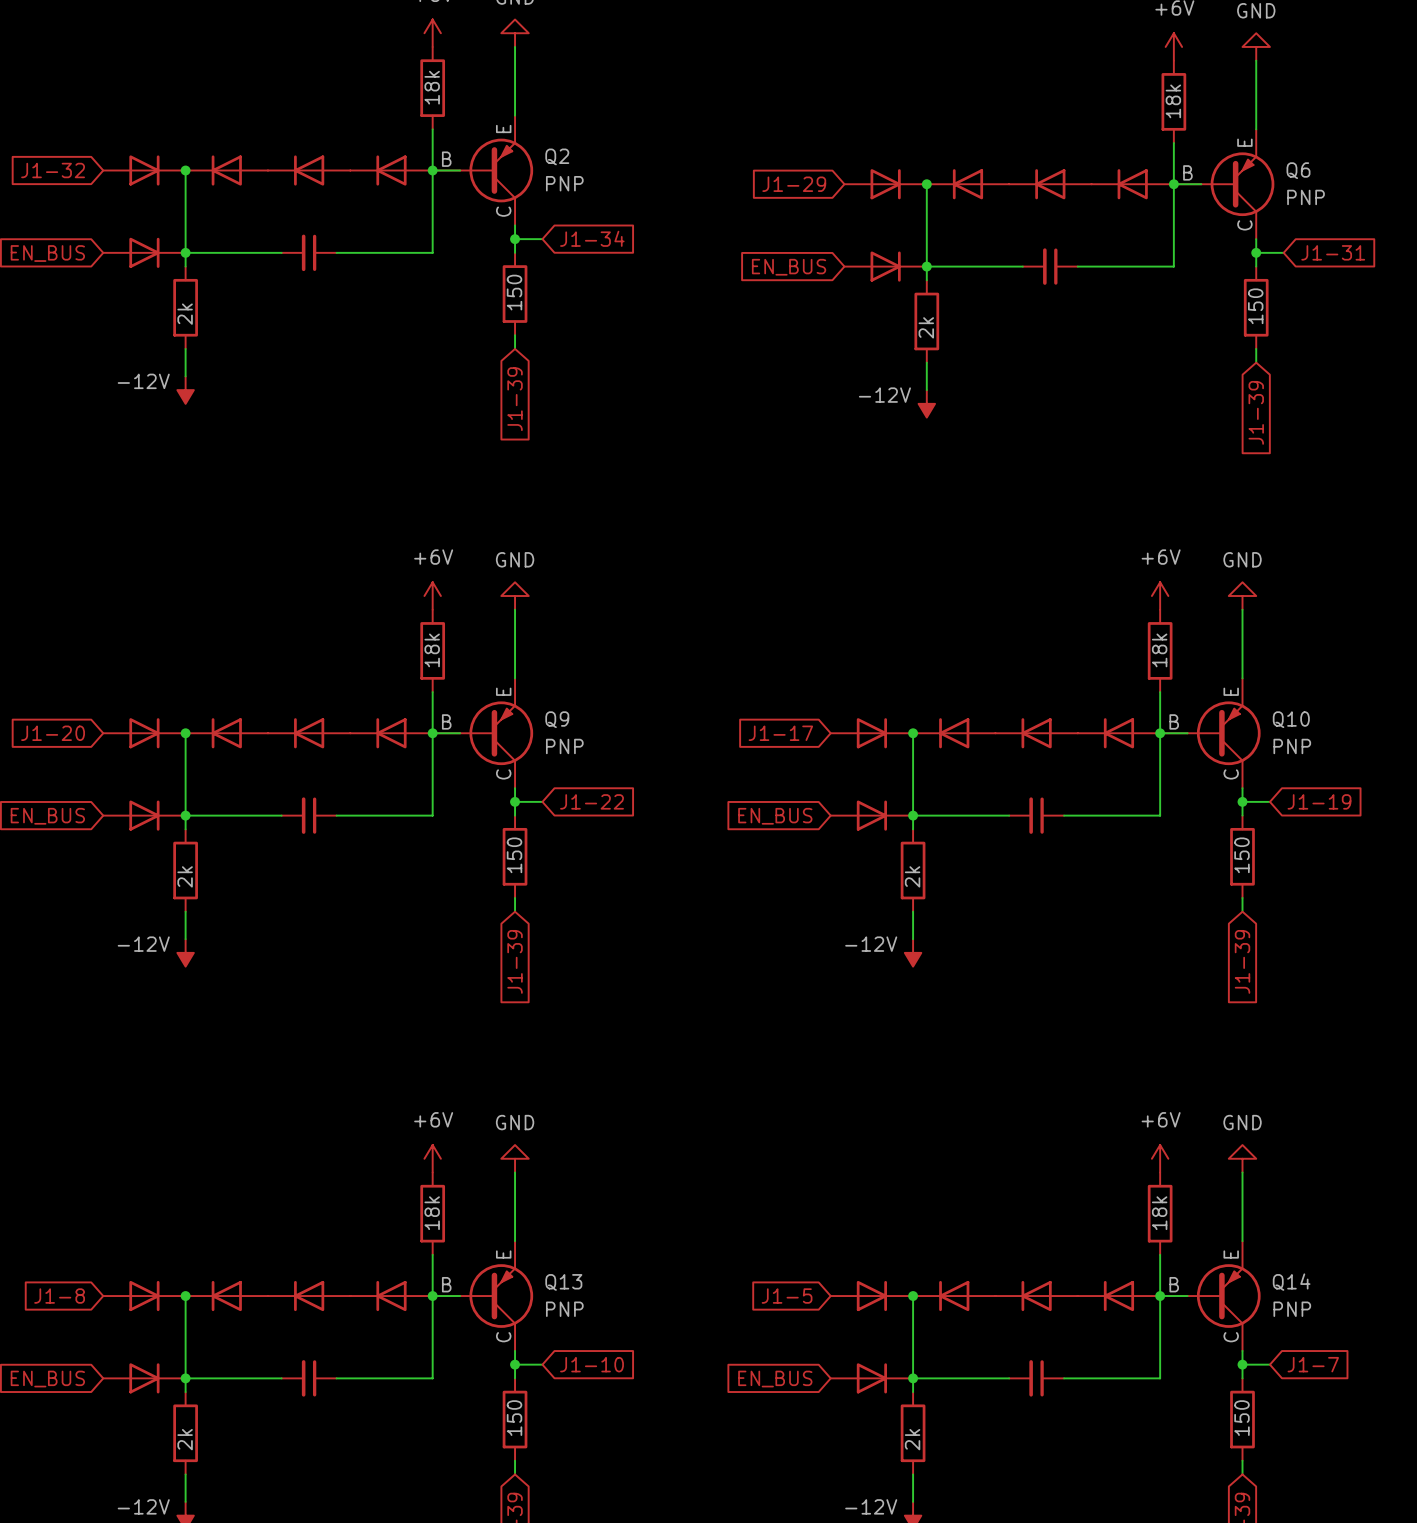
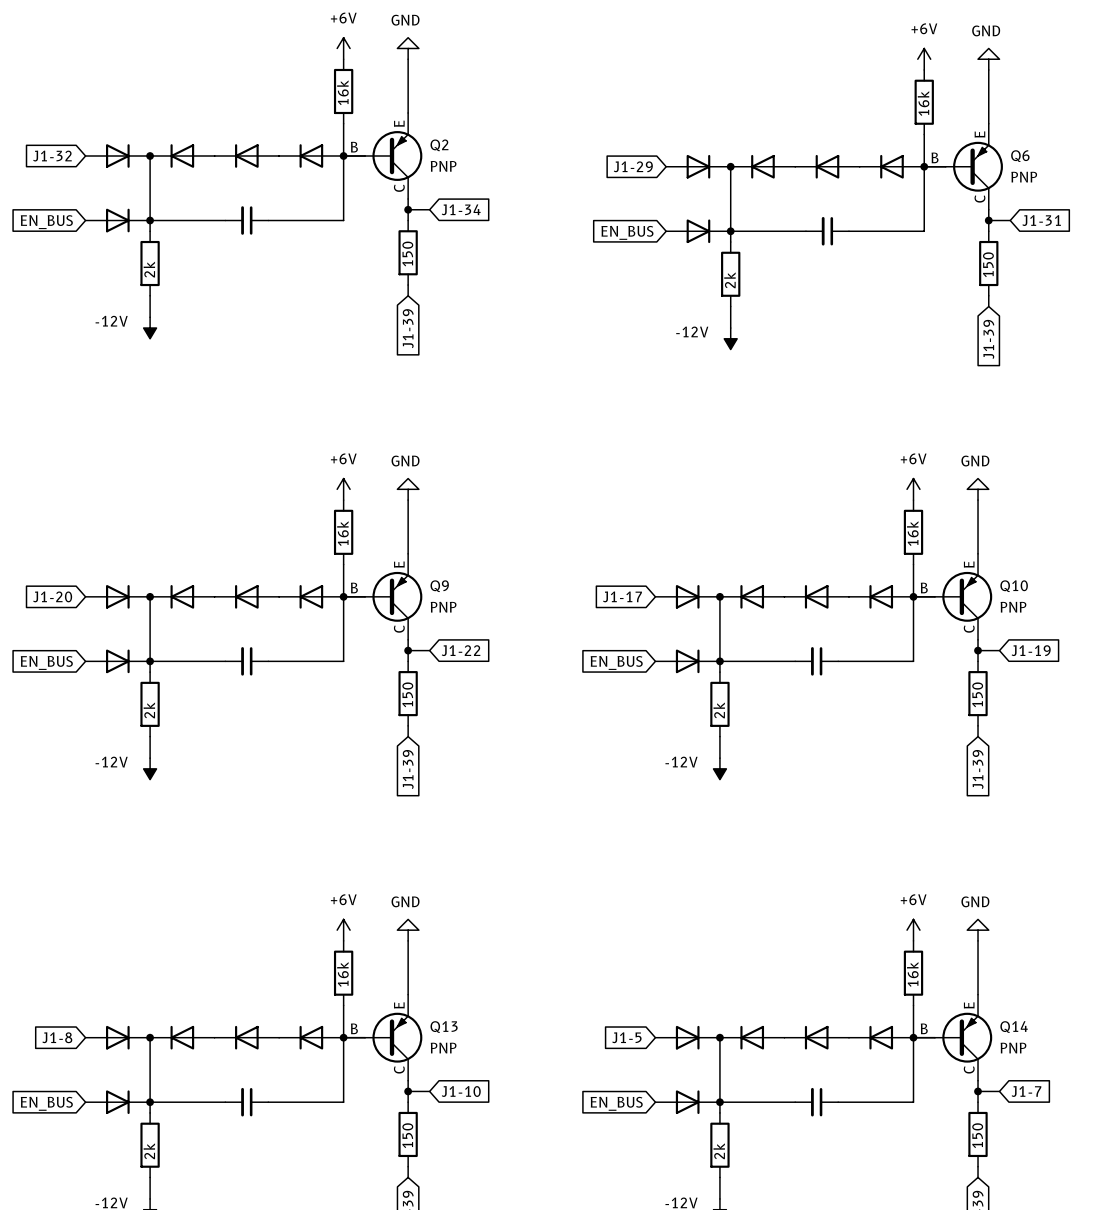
part value: 18k (432, 87) -> 16k (342, 92)
part value: 18k (1173, 101) -> 16k (923, 103)
part value: 18k (432, 650) -> 16k (342, 533)
part value: 18k (1159, 650) -> 16k (912, 533)
part value: 18k (432, 1213) -> 16k (342, 974)
part value: 18k (1159, 1213) -> 16k (912, 974)

